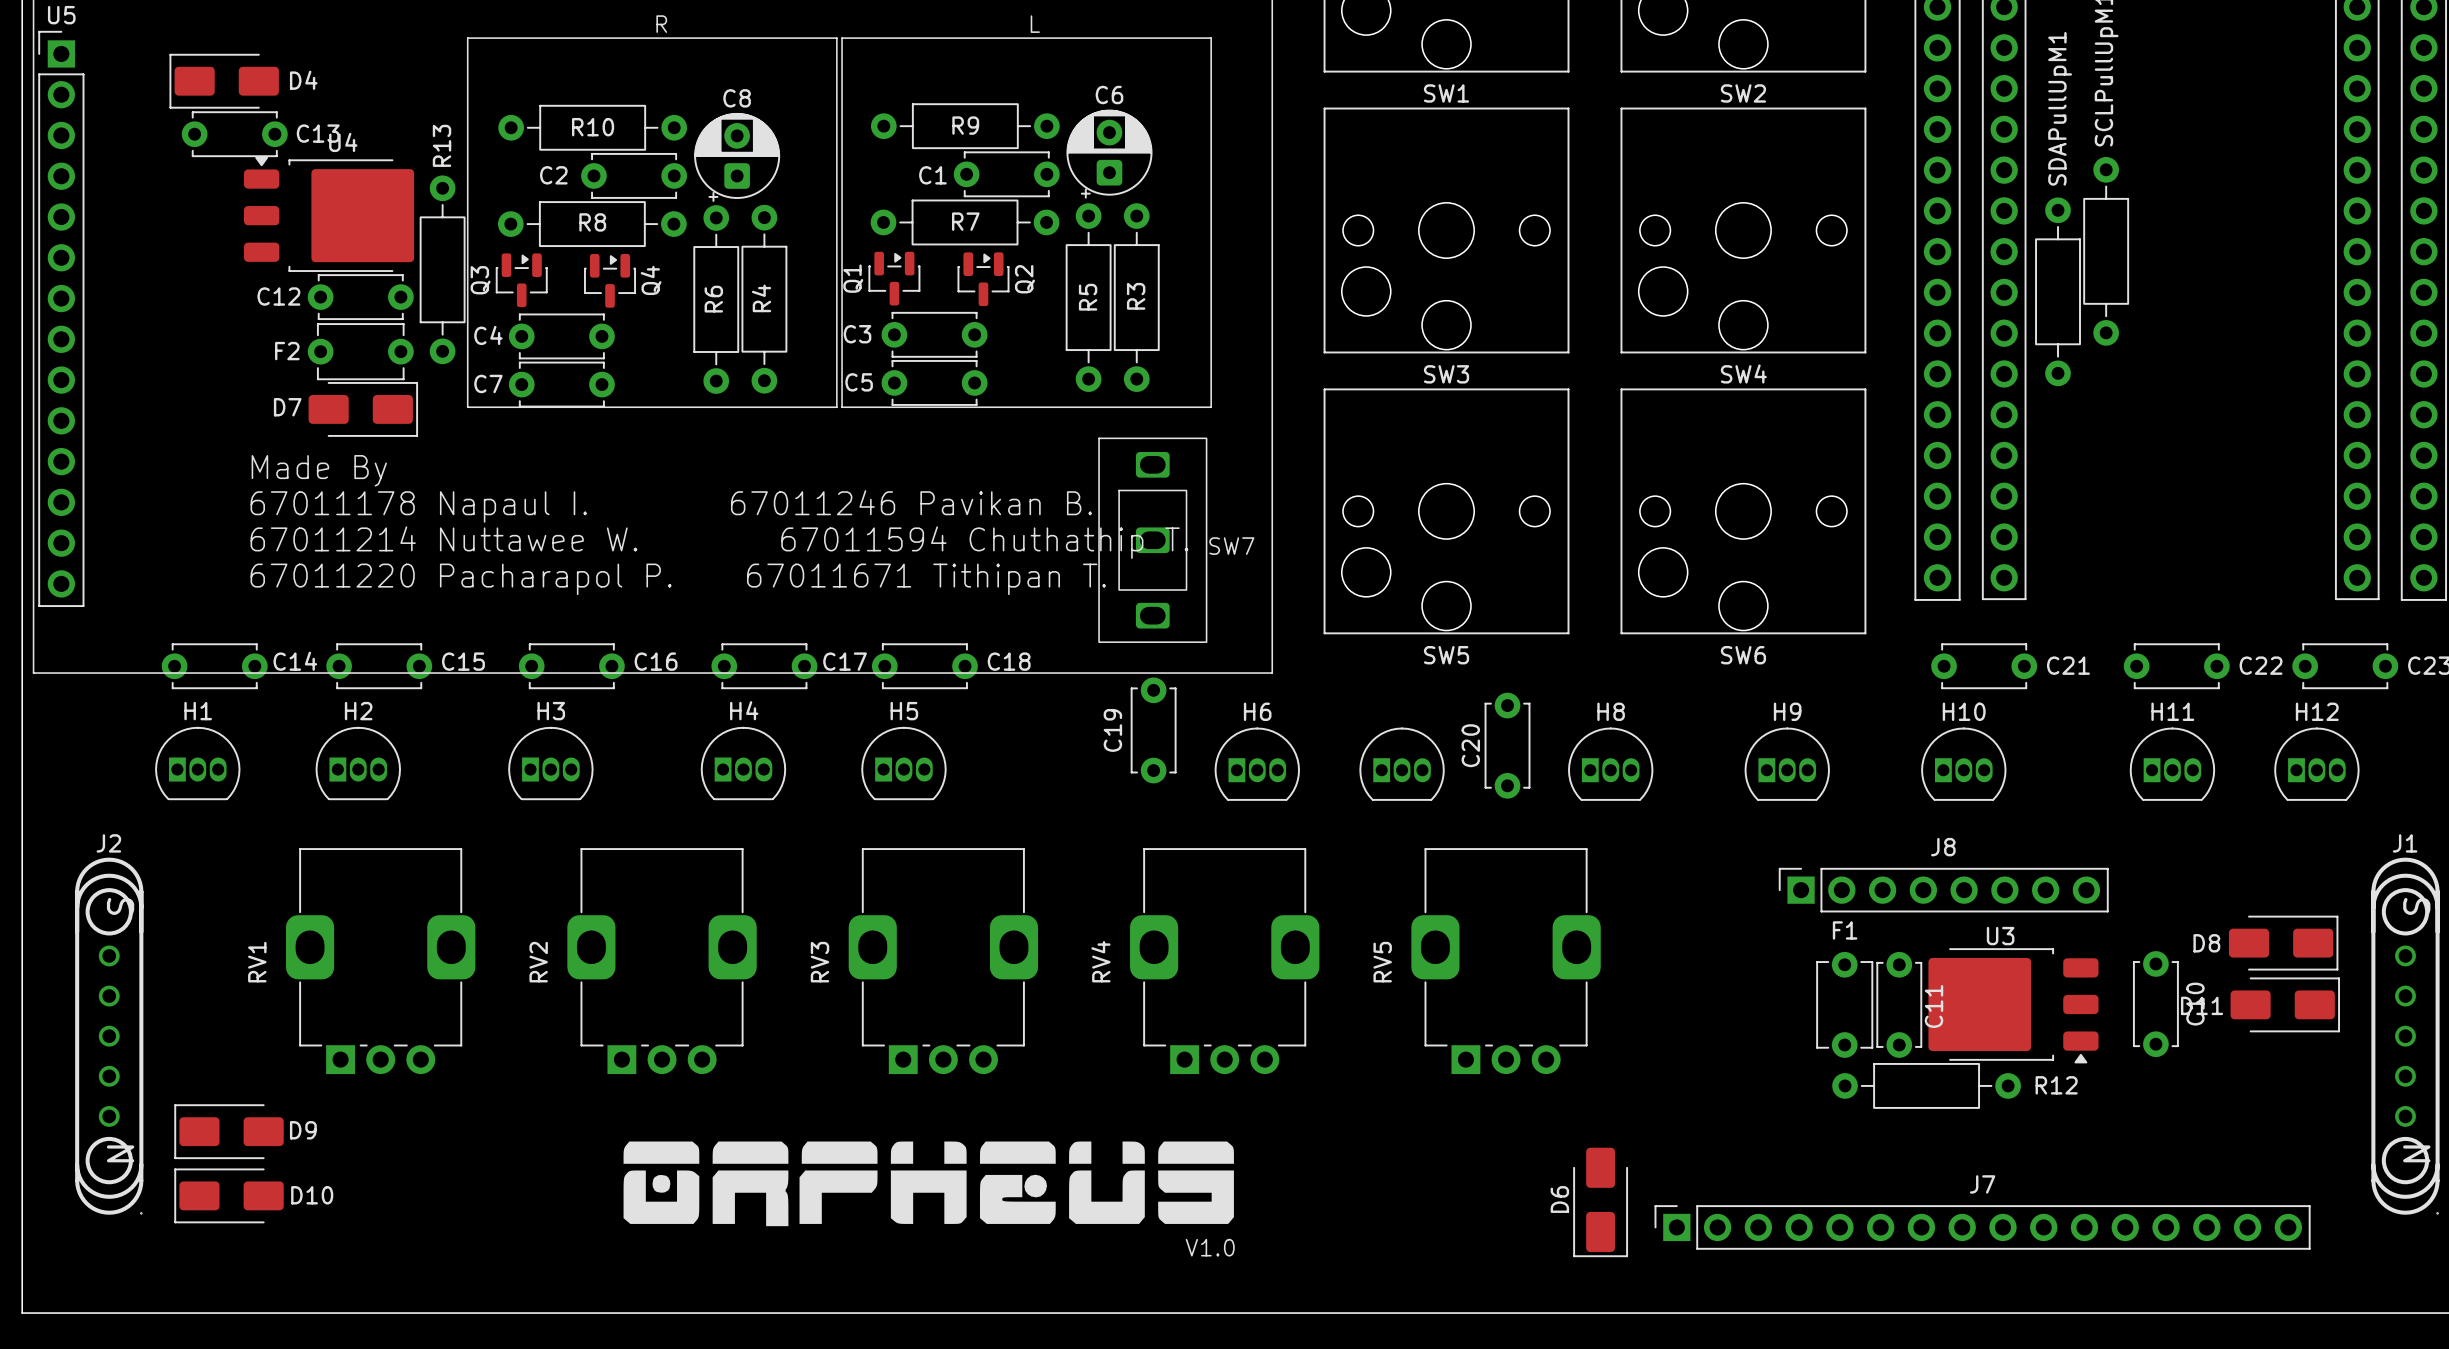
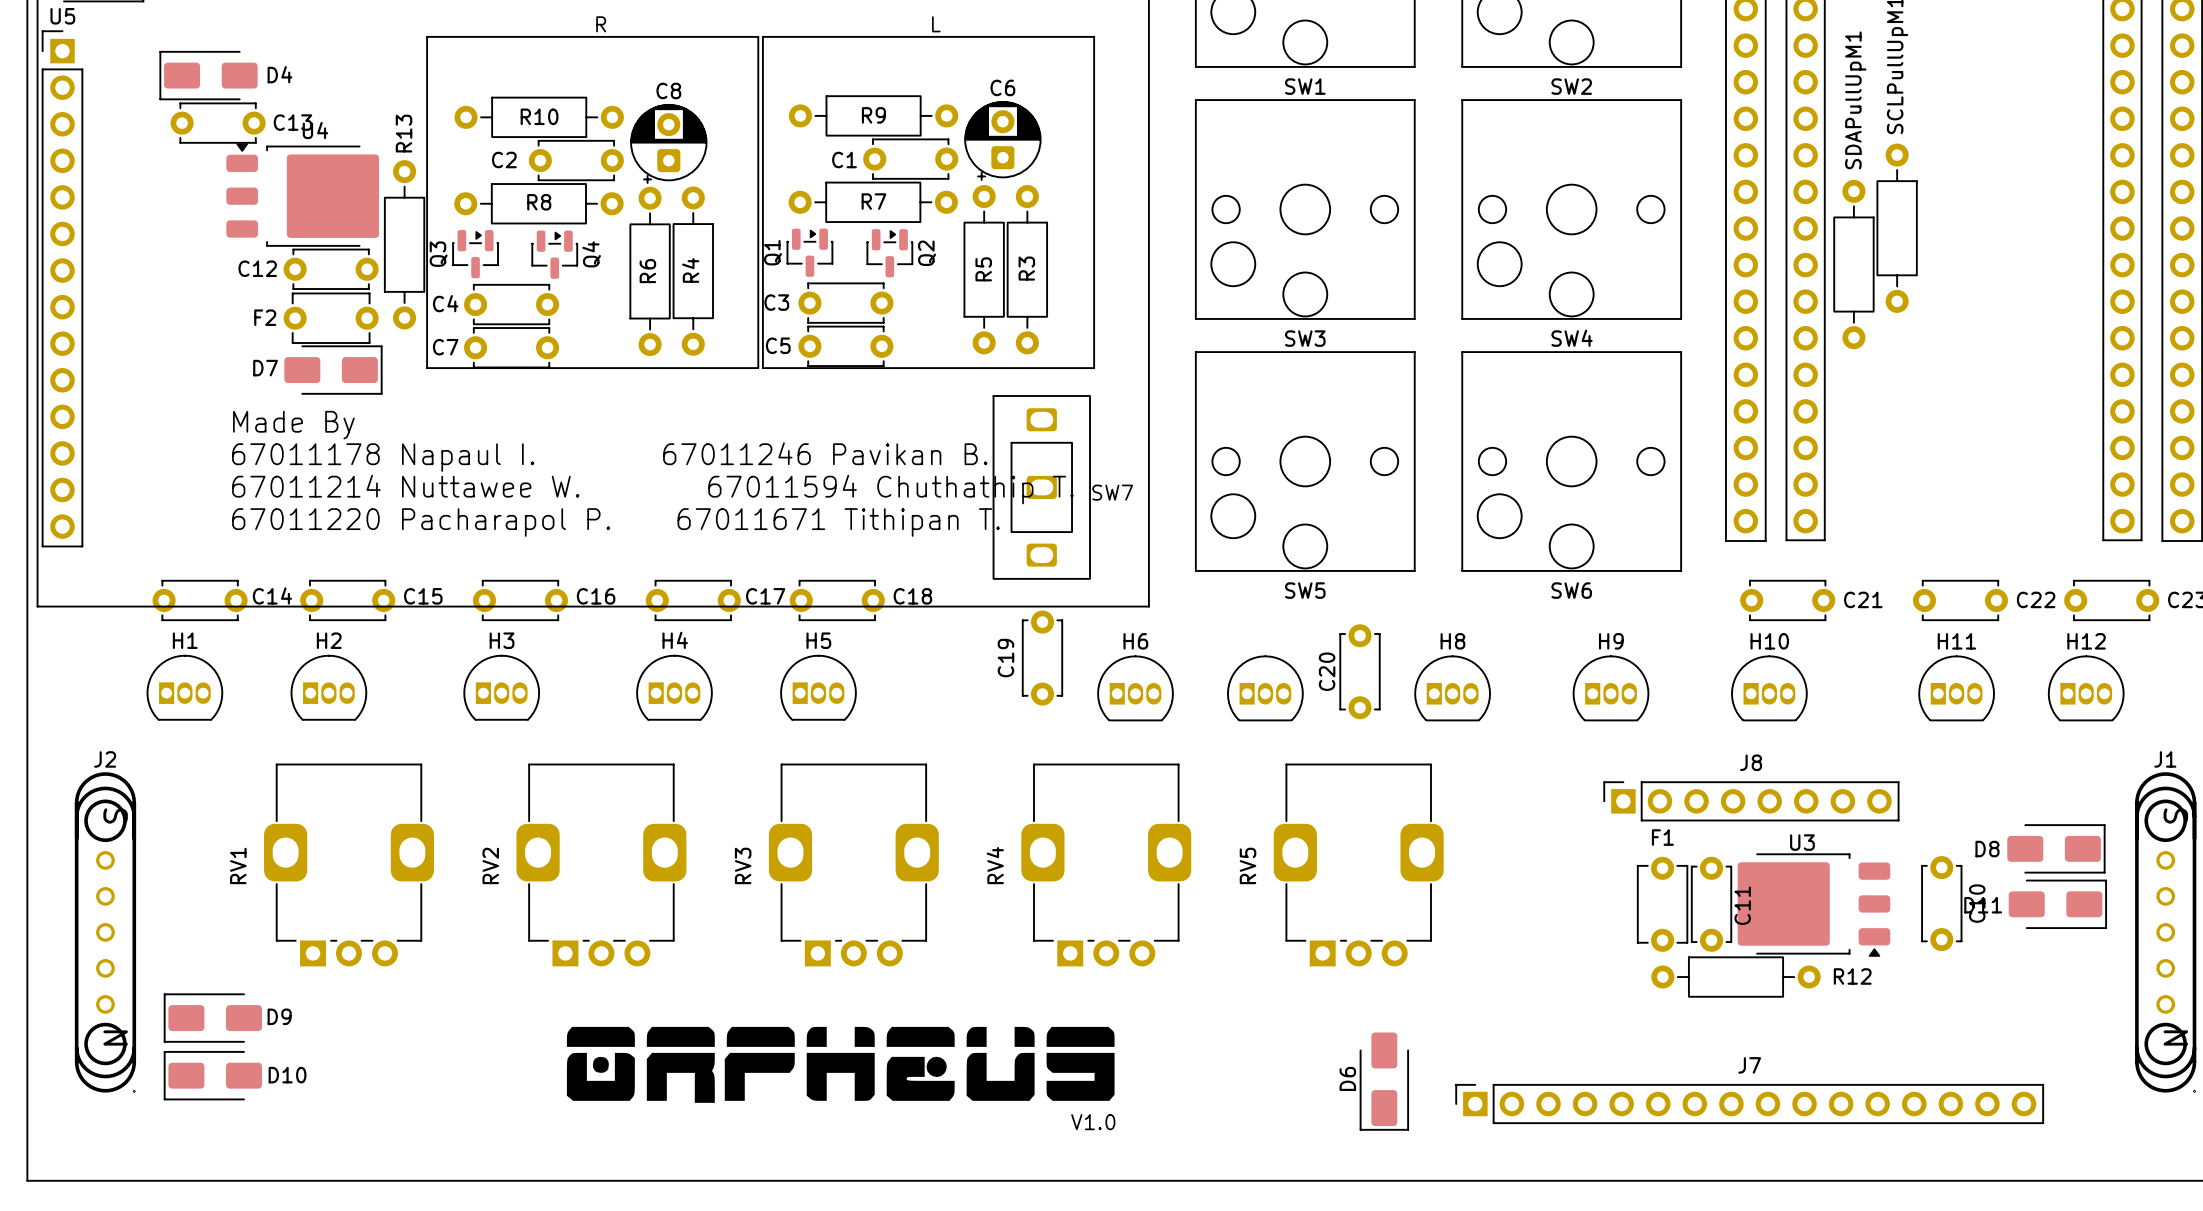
D6 position: (1600, 1202) -> (1384, 1081)
J7 position: (1982, 1227) -> (1749, 1104)

